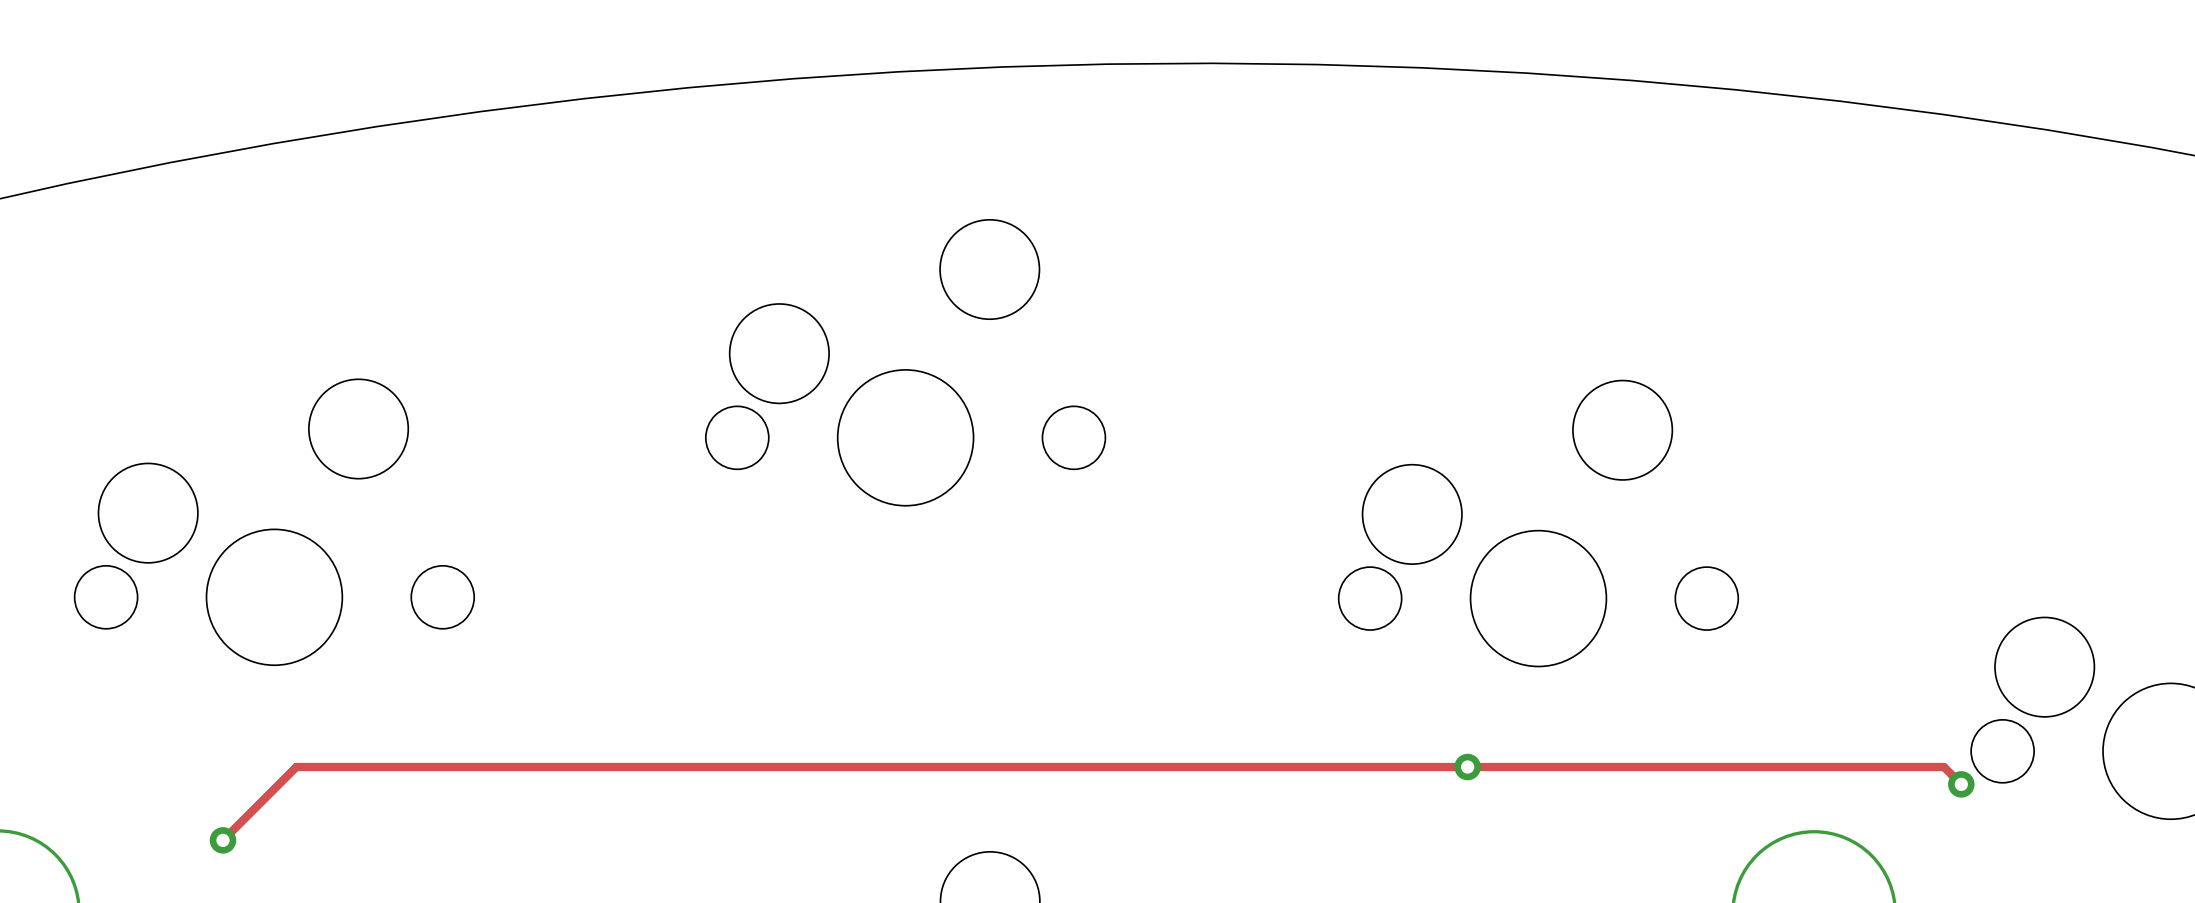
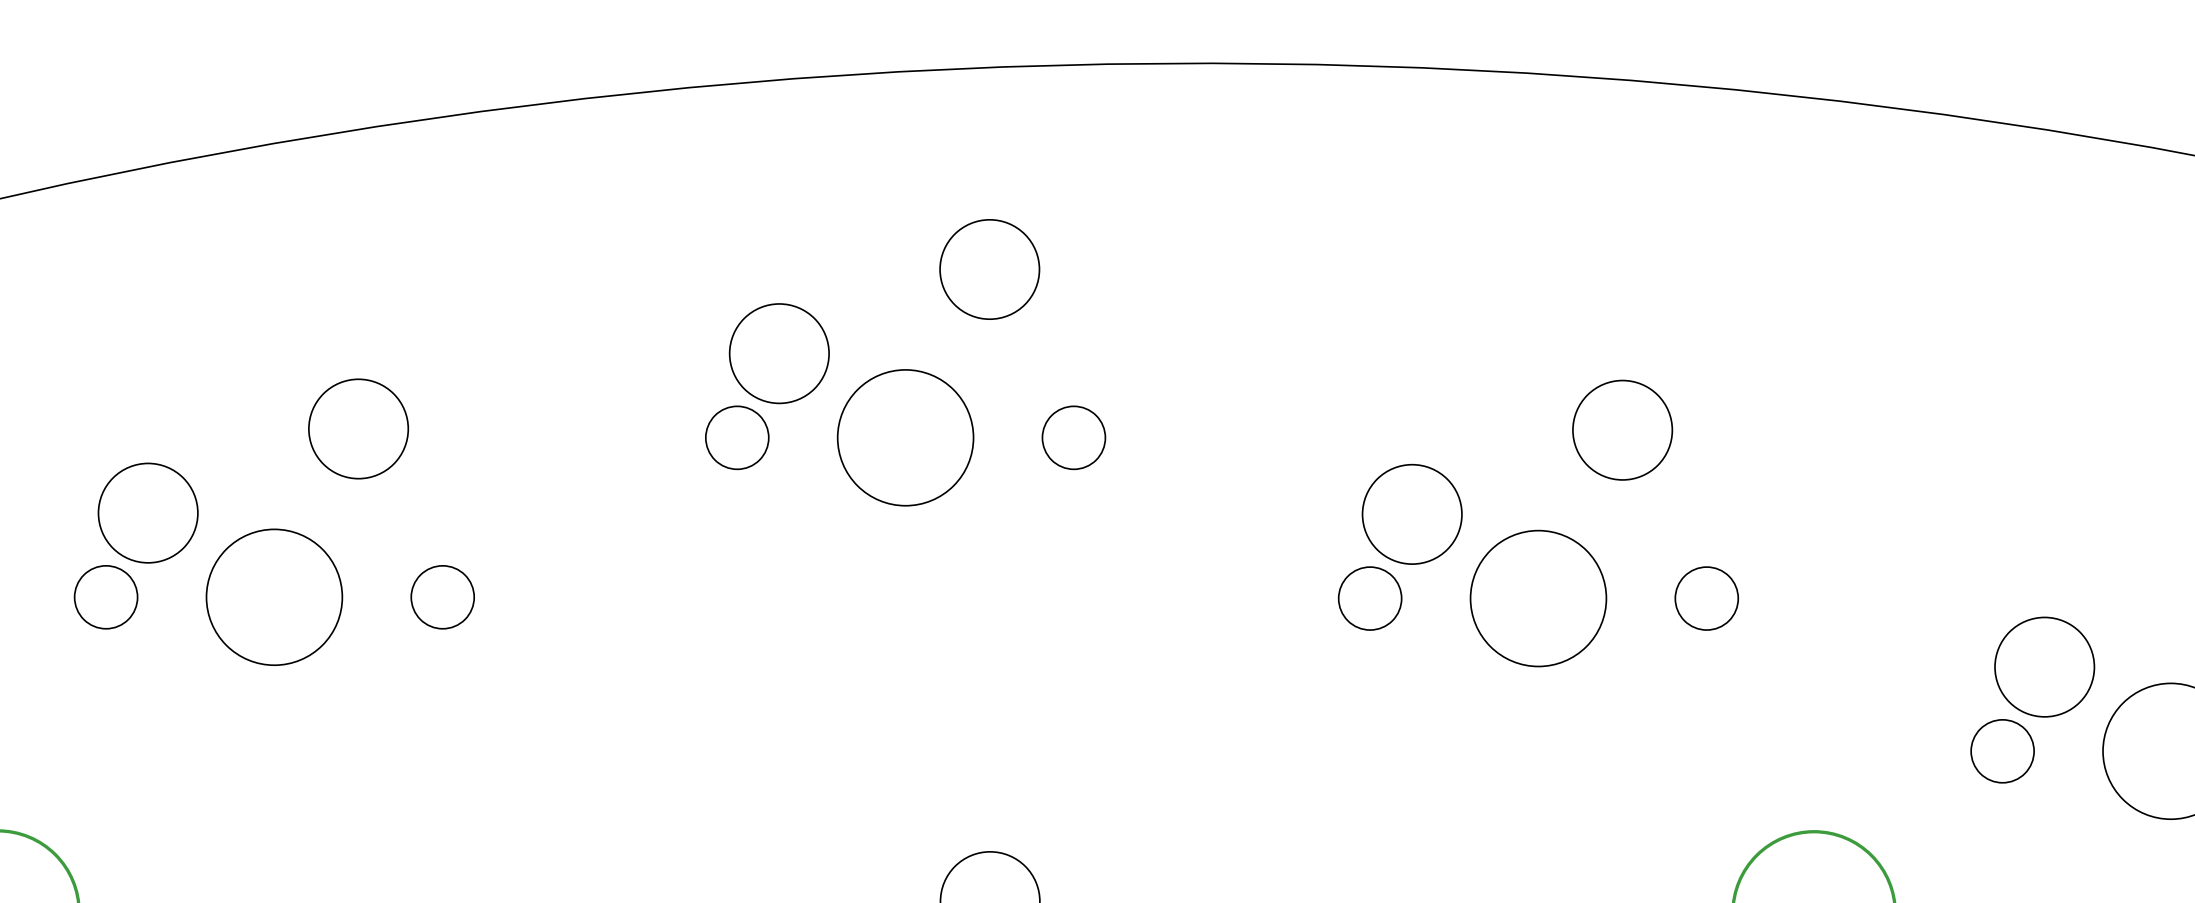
via: (1467, 767) -> none
track: (1961, 784) (1943, 767) (296, 767) (222, 840) -> none
via: (1961, 784) -> none
via: (222, 840) -> none

